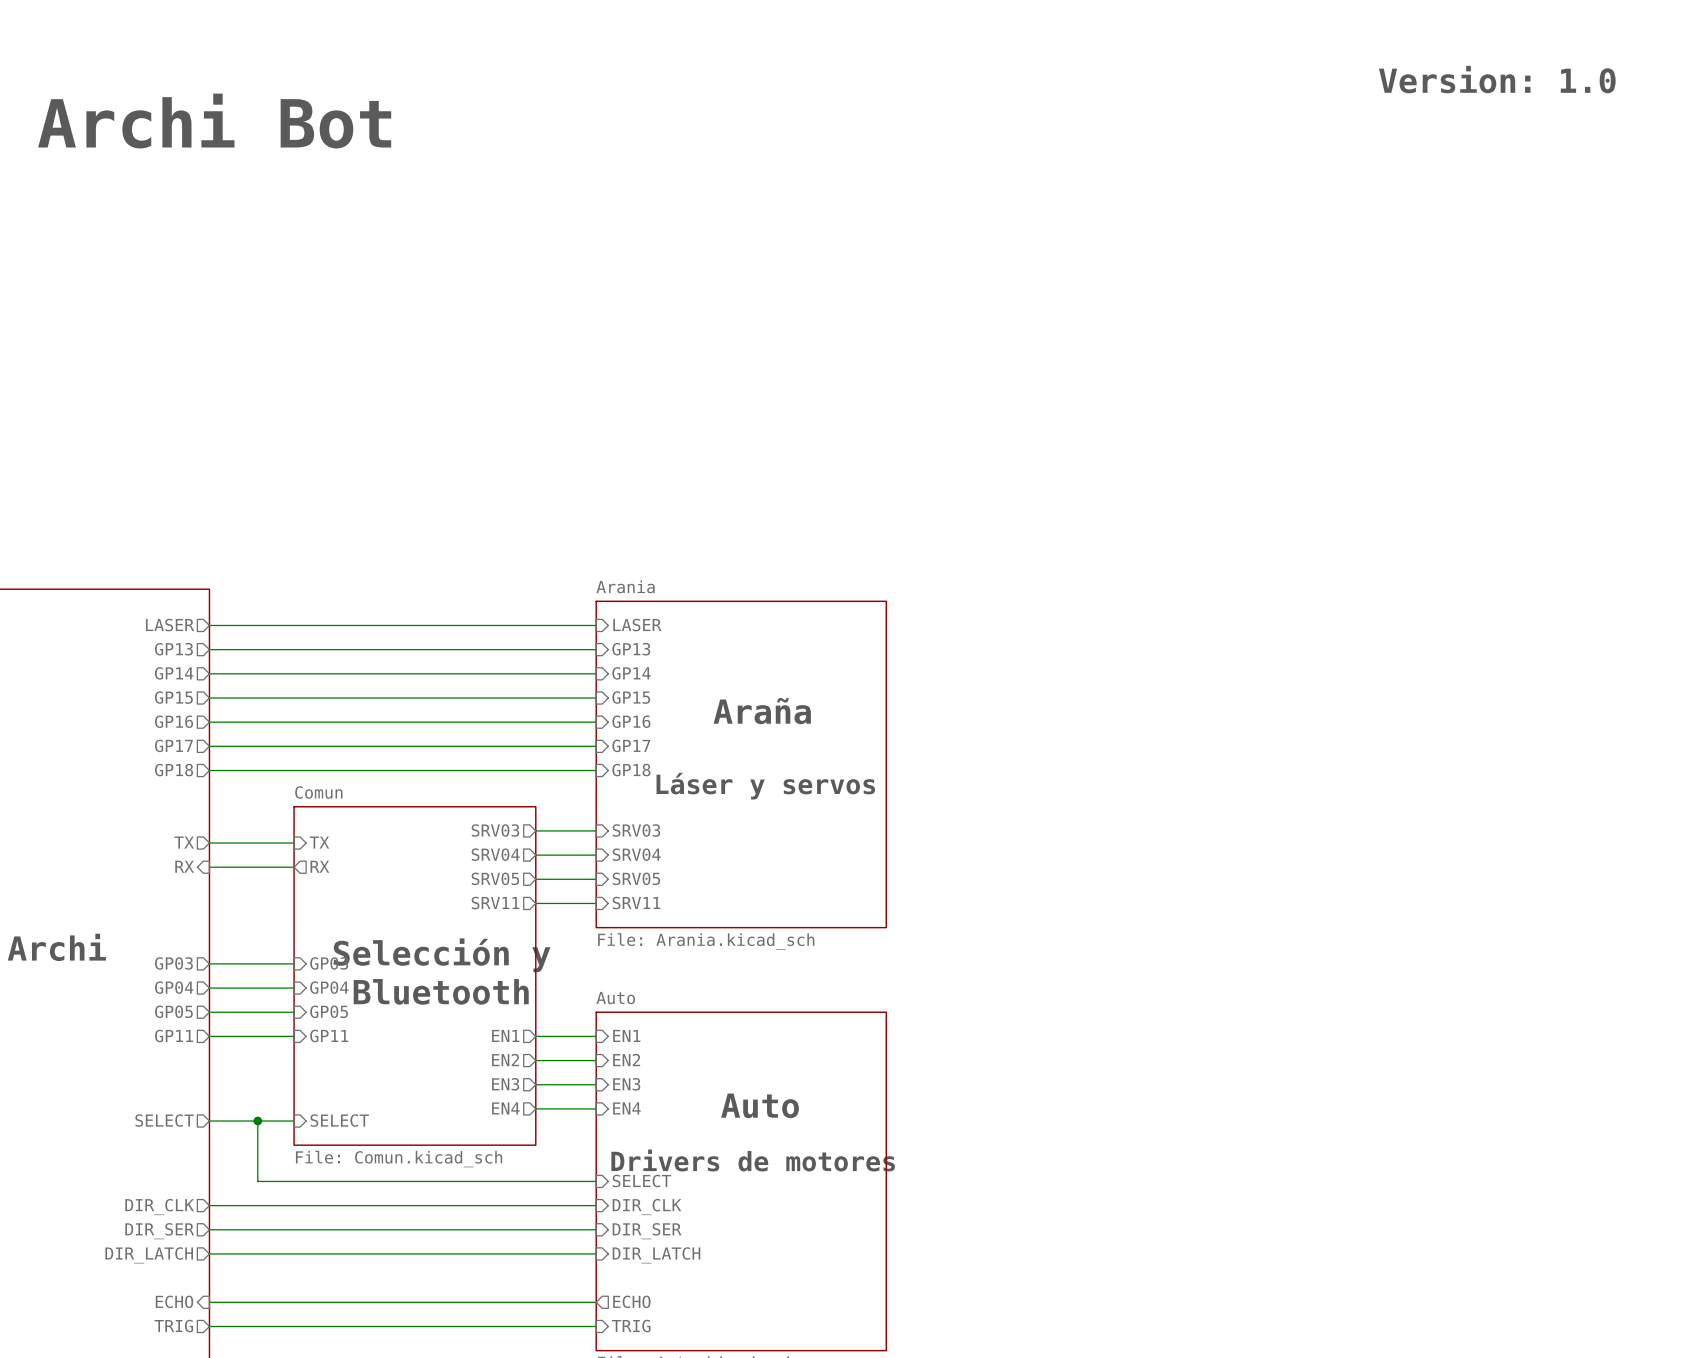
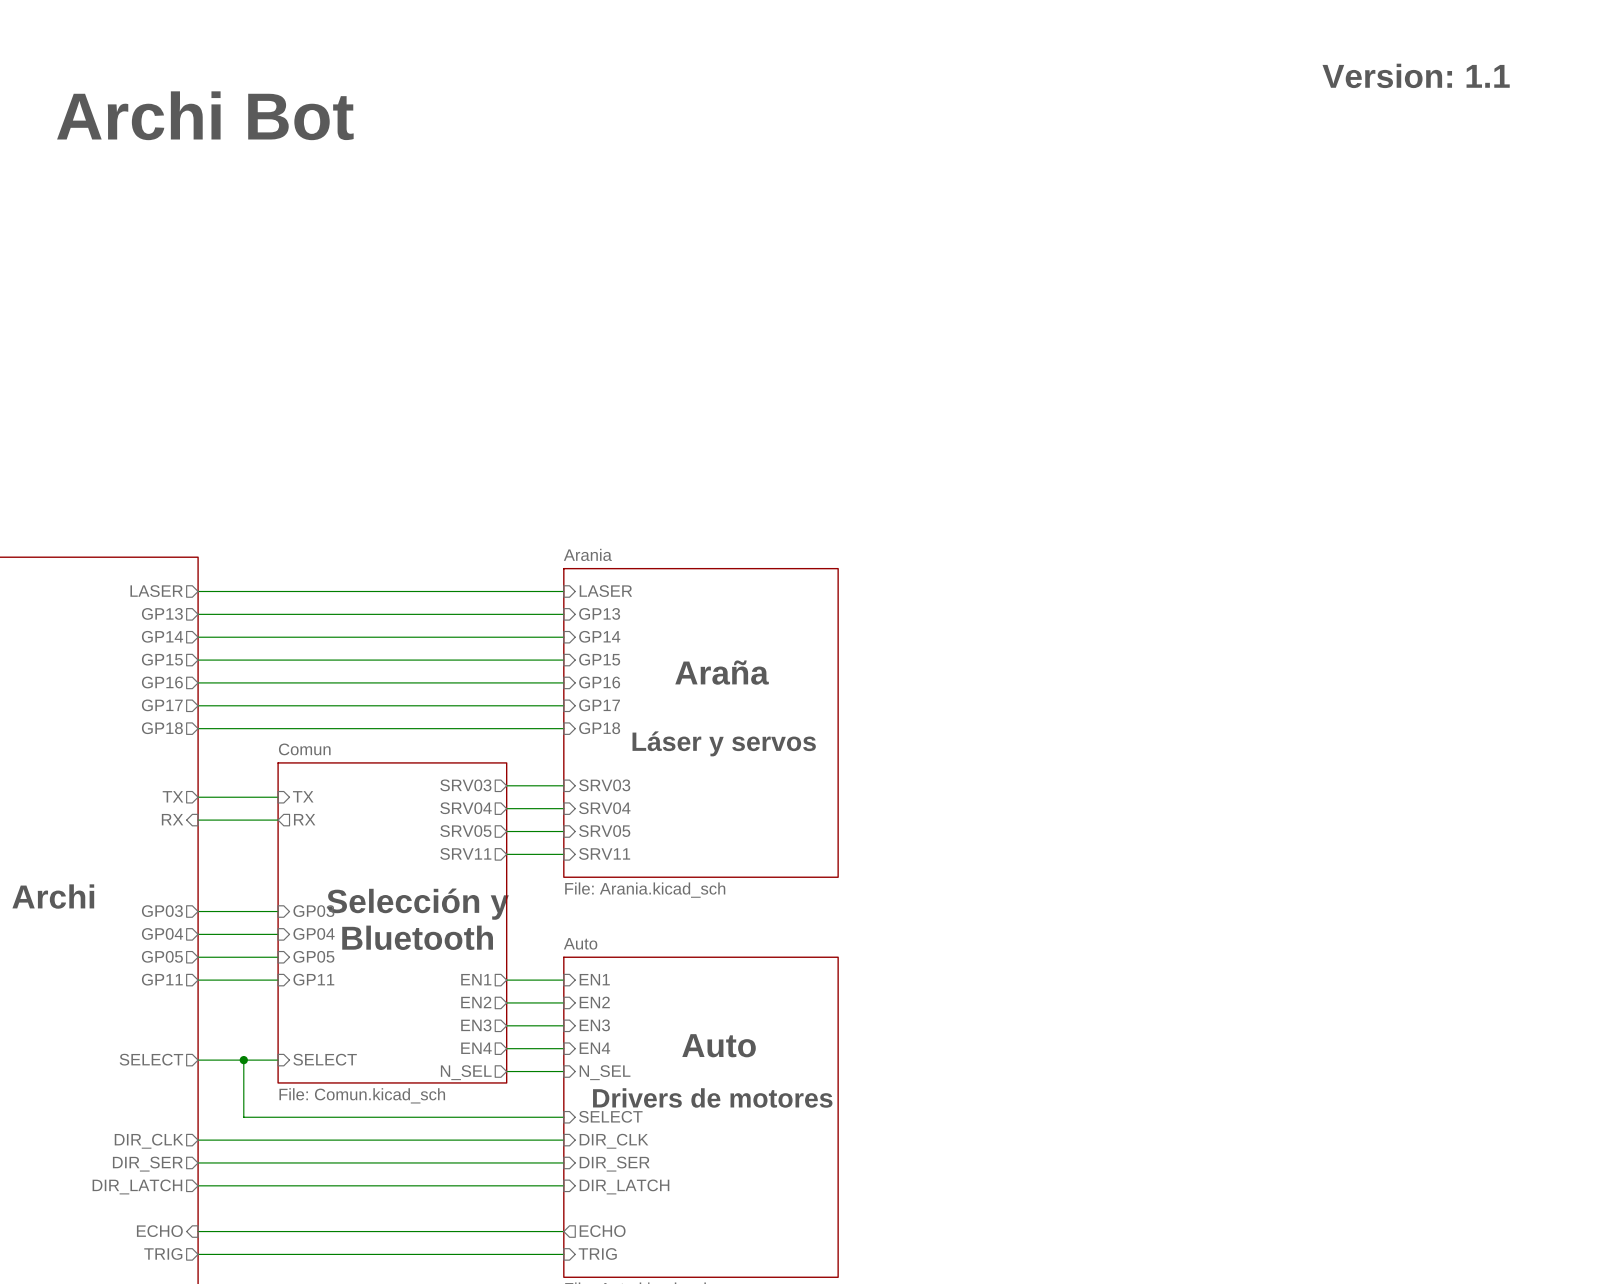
text: Version: 1.0 (1497, 79) -> Version: 1.1 (1416, 75)
wire: none -> (506, 1071) (563, 1071)
sheet pin: none -> N_SEL (466, 1072)
sheet pin: none -> N_SEL (605, 1072)

